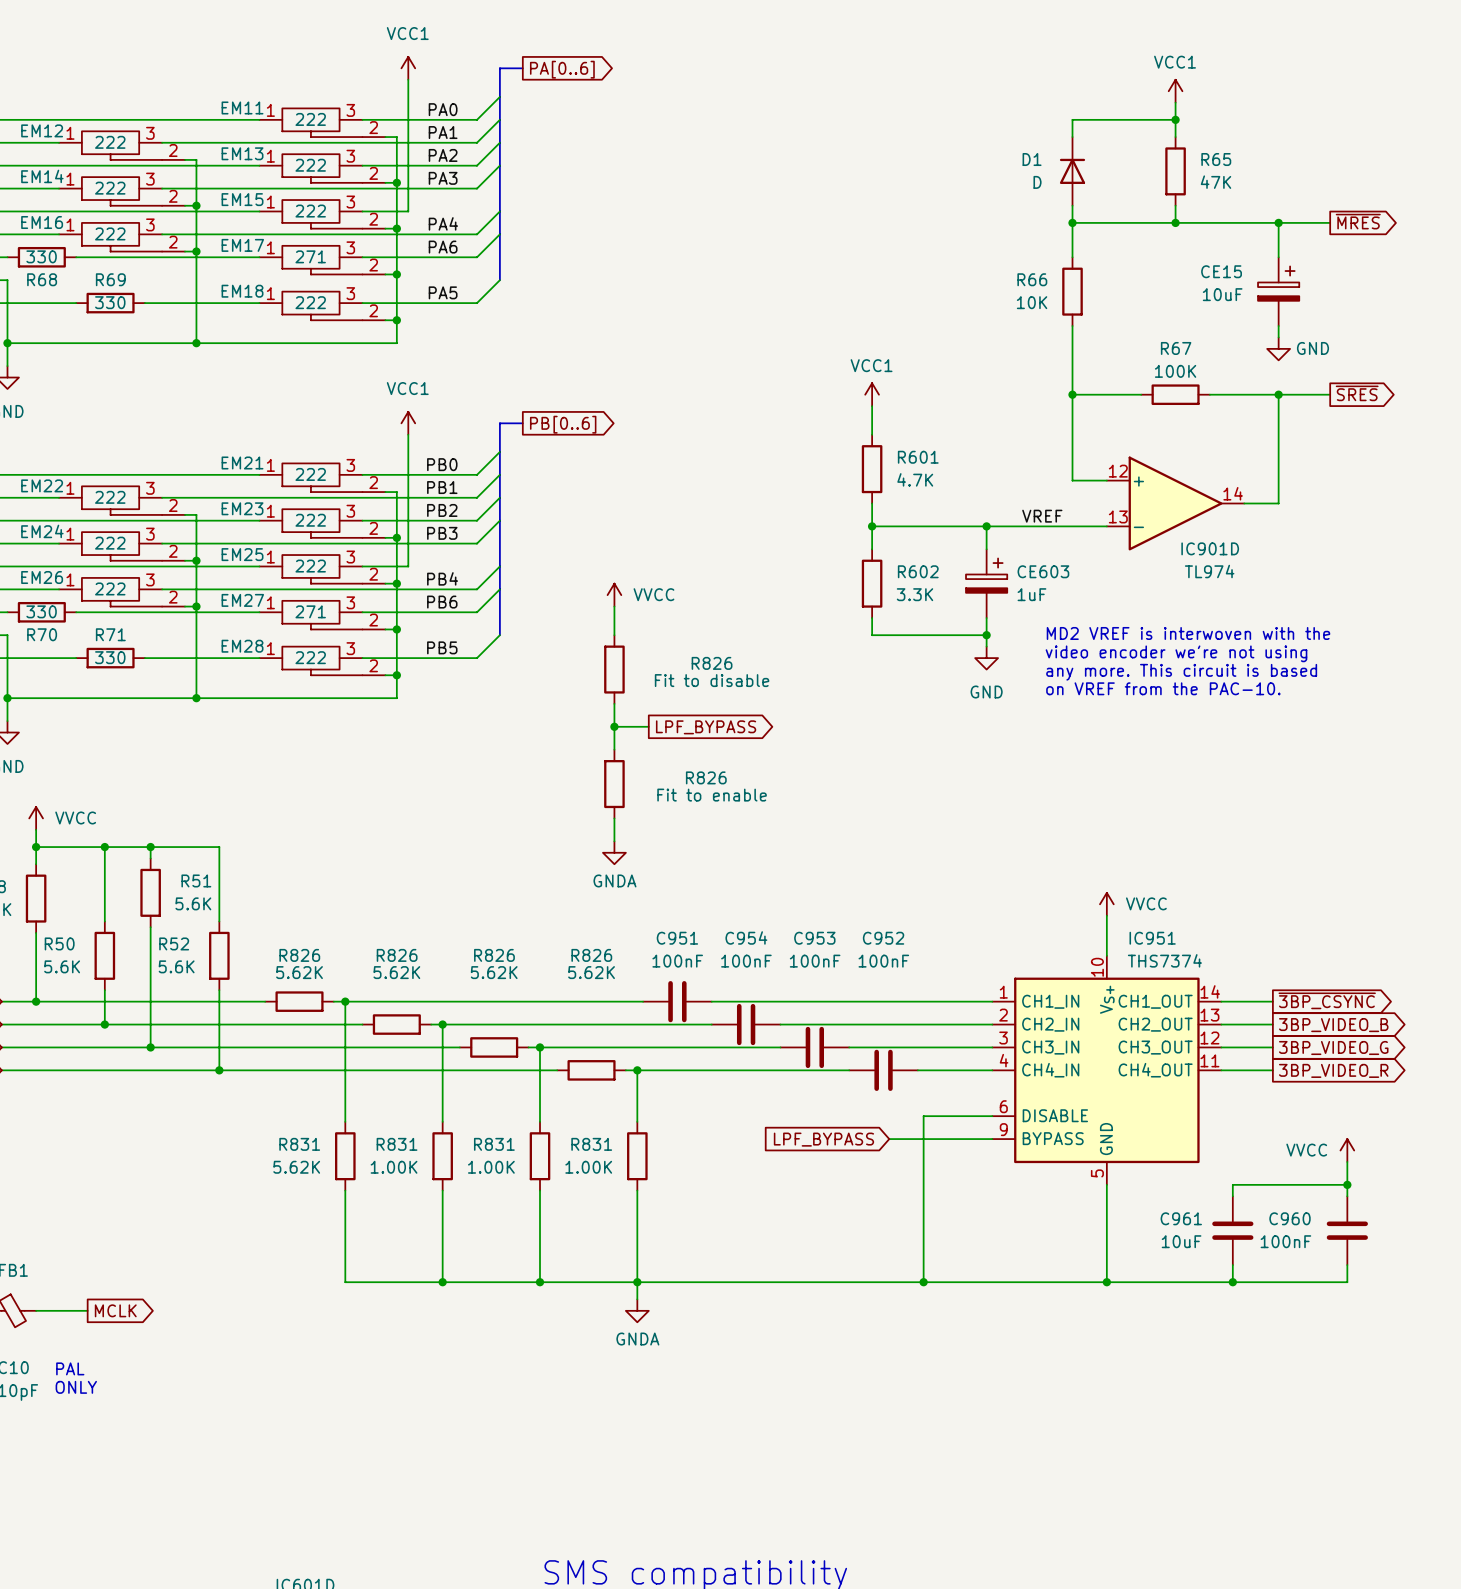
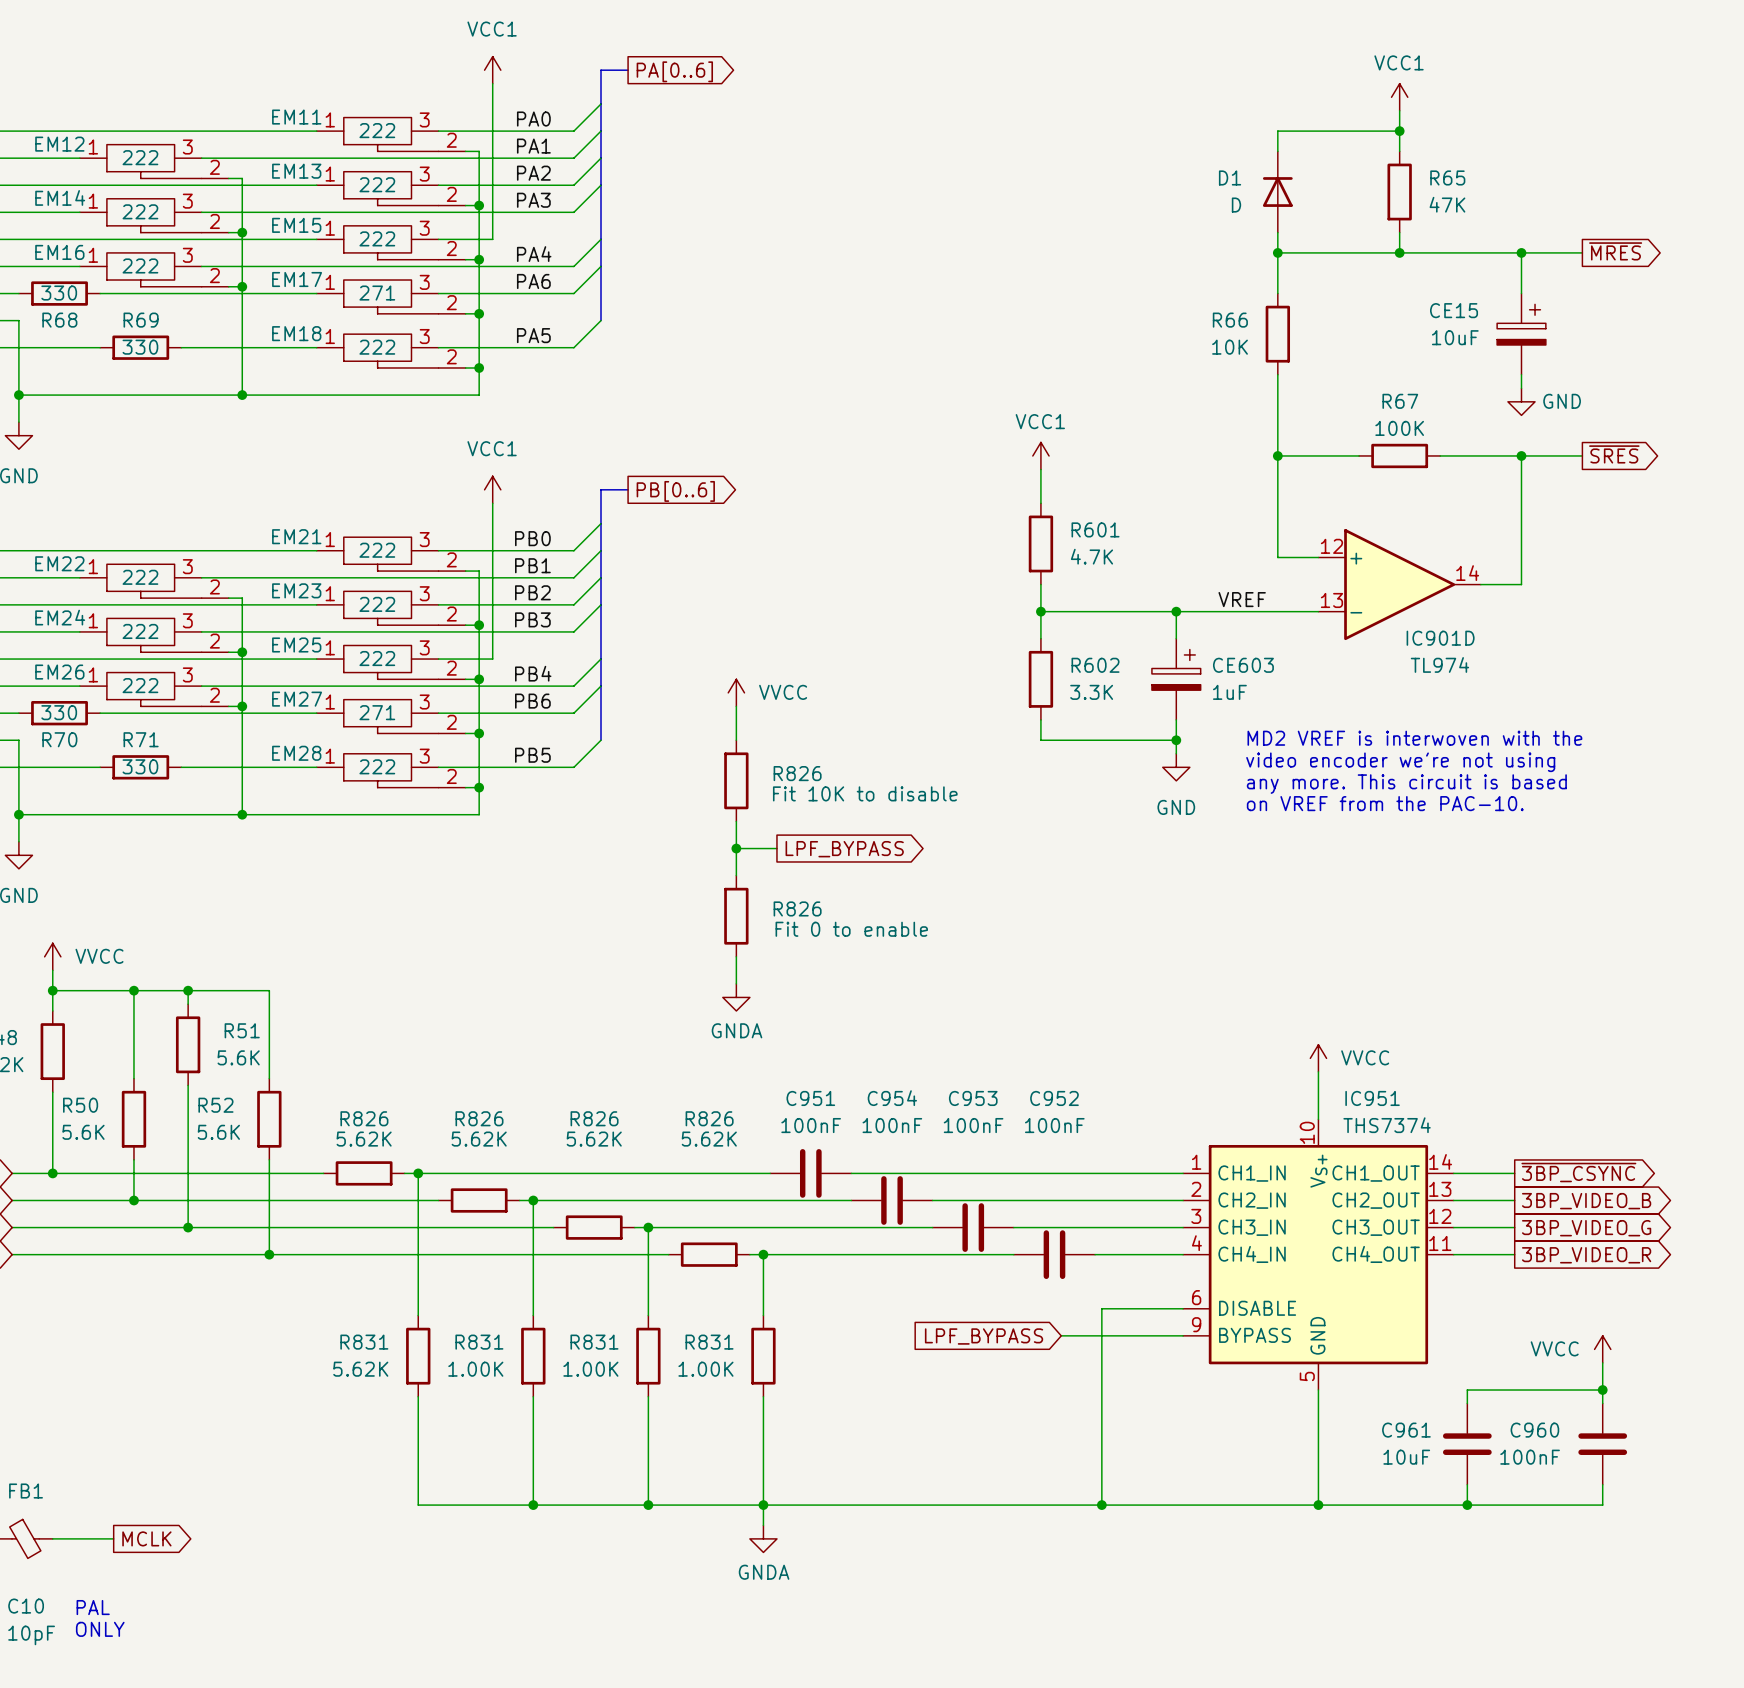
R826 name position: R826 (712, 663) -> R826 (797, 773)
R826 value: Fit to disable (712, 680) -> Fit 10K to disable (865, 793)
R826 name position: R826 (706, 777) -> R826 (797, 908)
R826 value: Fit to enable (712, 795) -> Fit 0 to enable (851, 929)

